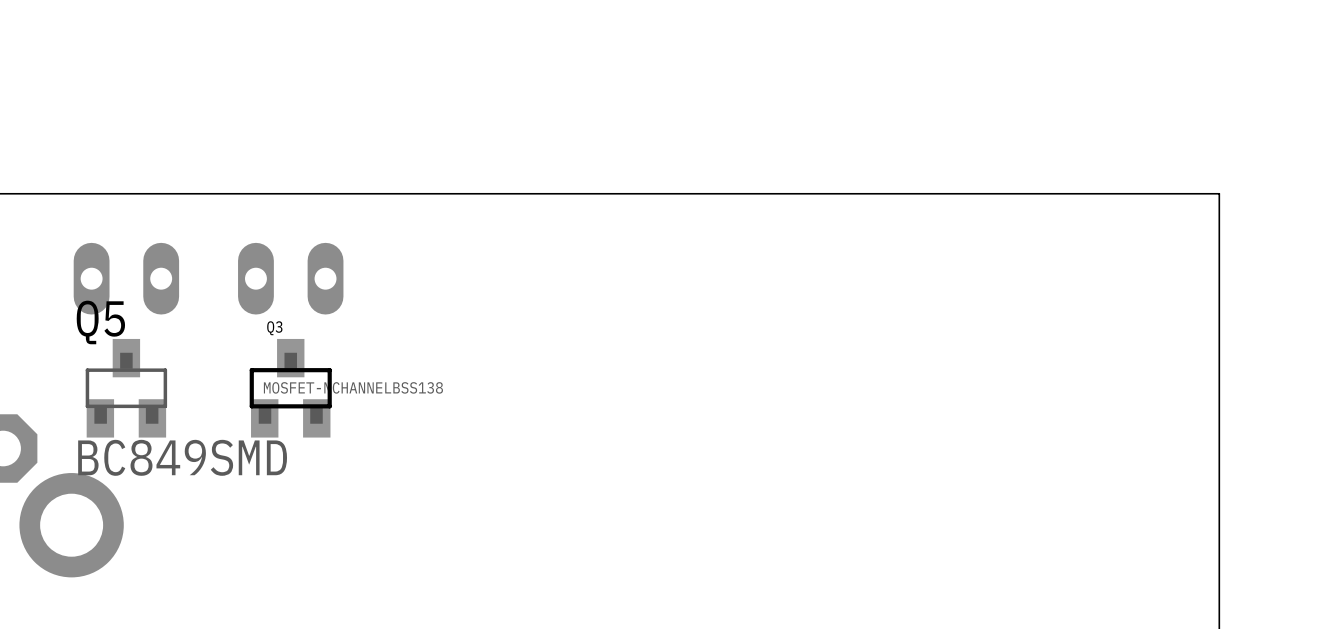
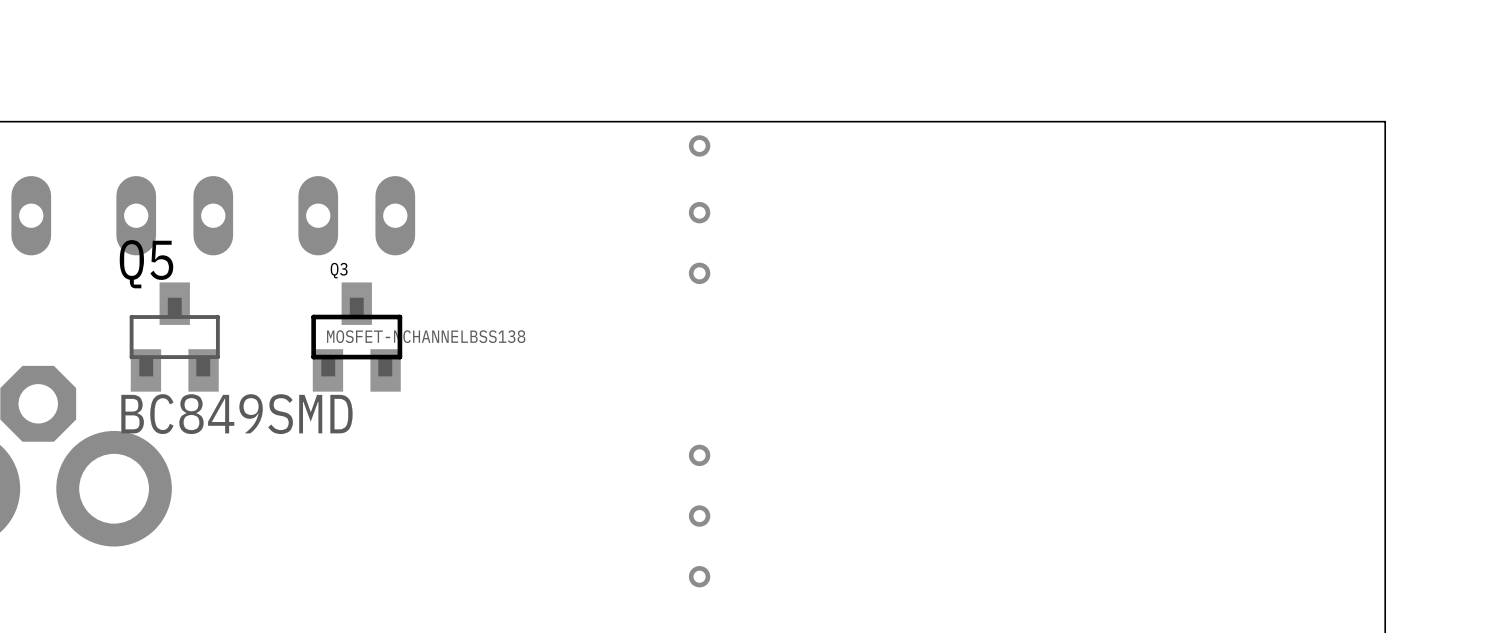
via: none -> (699, 145)
via: none -> (699, 212)
via: none -> (699, 273)
via: none -> (699, 455)
via: none -> (699, 516)
via: none -> (699, 576)

